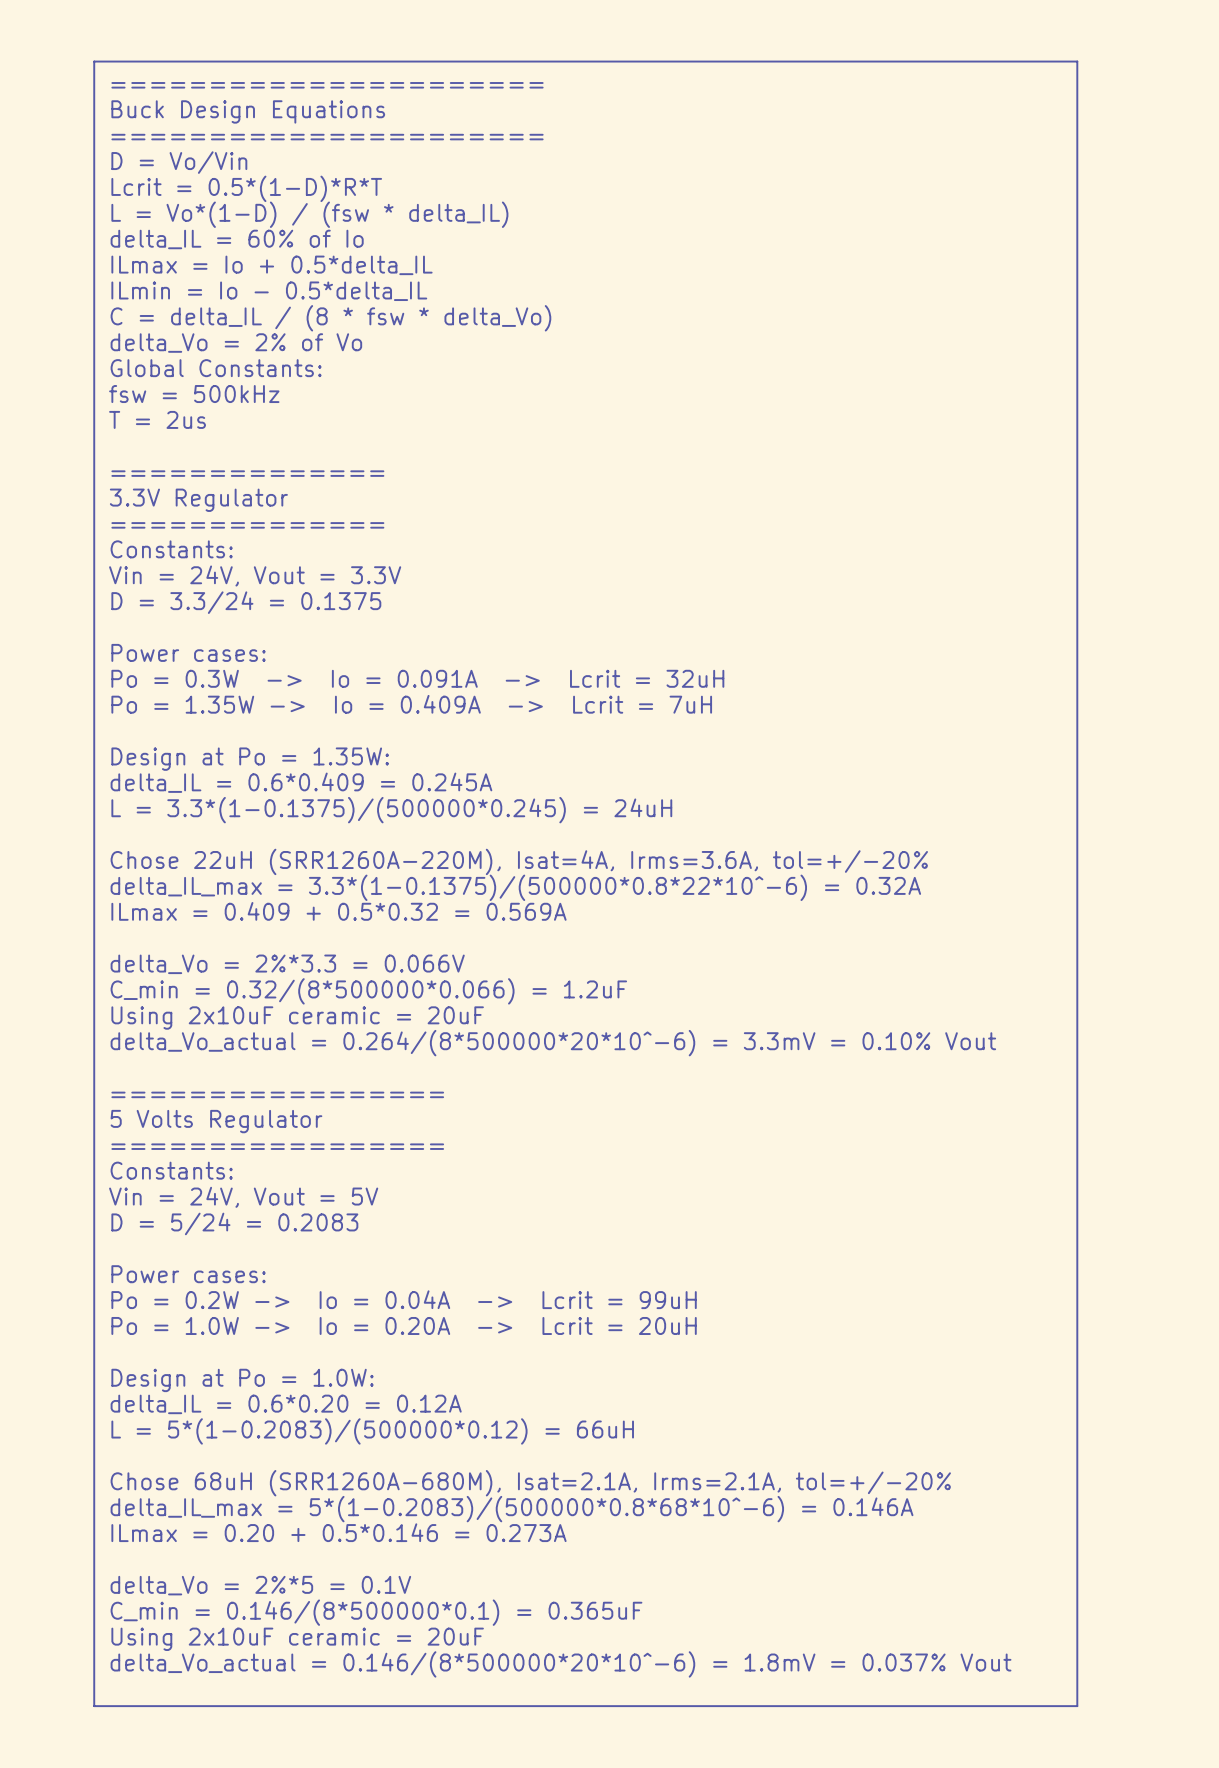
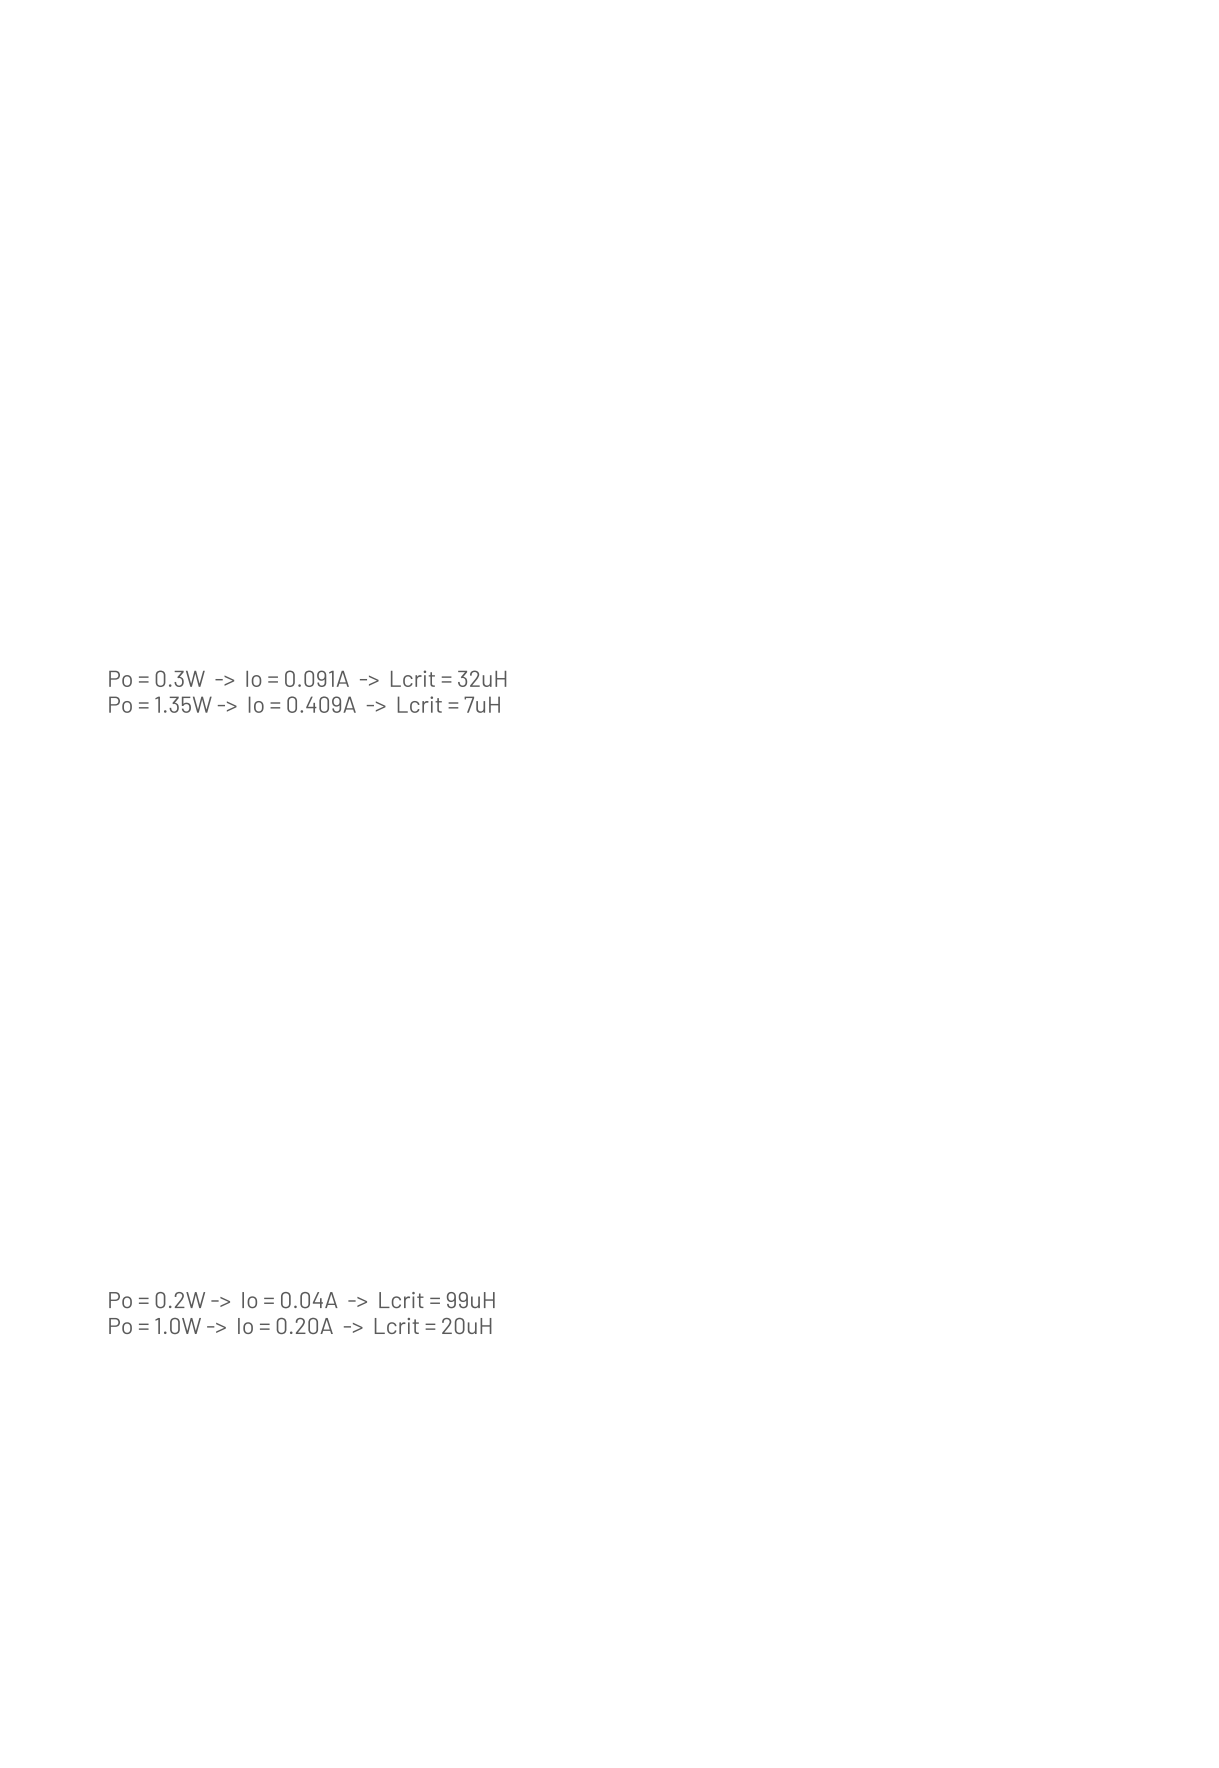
line: (94, 61) (1077, 61) (1077, 1706) (94, 1706) (94, 61) -> none
text: ====================== (327, 85) -> none
text: Buck Design Equations (248, 111) -> none
text: ====================== (327, 137) -> none
text: D = Vo/Vin (179, 162) -> none
text: Lcrit = 0.5*(1-D)*R*T (246, 188) -> none
text: L = Vo*(1-D) / (fsw * delta_IL) (309, 214) -> none
text: delta_IL = 60% of Io (237, 239) -> none
text: ILmax = Io + 0.5*delta_IL (271, 265) -> none
text: ILmin = Io - 0.5*delta_IL (269, 291) -> none
text: C = delta_IL / (8 * fsw * delta_Vo) (330, 318) -> none
text: delta_Vo = 2% of Vo (236, 343) -> none
text: Global Constants: (216, 368) -> none
text: fsw = 500kHz (194, 394) -> none
text: T = 2us (157, 419) -> none
text: ============== (247, 473) -> none
text: 3.3V Regulator (198, 500) -> none
text: ============== (247, 525) -> none
text: Constants: (171, 549) -> none
text: Vin = 24V, Vout = 3.3V (255, 576) -> none
text: D = 3.3/24 = 0.1375 (246, 602) -> none
text: Power cases: (188, 652) -> none
text: Design at Po = 1.35W: (250, 759) -> none
text: delta_IL = 0.6*0.409 = 0.245A (301, 782) -> none
text: L = 3.3*(1-0.1375)/(500000*0.245) = 24uH (391, 810) -> none
text: Chose 22uH (SRR1260A-220M), Isat=4A, Irms=3.6A, tol=+/-20% (519, 861) -> none
text: delta_IL_max = 3.3*(1-0.1375)/(500000*0.8*22*10^-6) = 0.32A (515, 887) -> none
text: ILmax = 0.409 + 0.5*0.32 = 0.569A (338, 911) -> none
text: delta_Vo = 2%*3.3 = 0.066V (287, 964) -> none
text: C_min = 0.32/(8*500000*0.066) = 1.2uF (368, 991) -> none
text: Using 2x10uF ceramic = 20uF (297, 1018) -> none
text: delta_Vo_actual = 0.264/(8*500000*20*10^-6) = 3.3mV = 0.10% Vout (553, 1043) -> none
text: ================= (277, 1094) -> none
text: 5 Volts Regulator (216, 1121) -> none
text: ================= (277, 1146) -> none
text: Constants: (171, 1170) -> none
text: Vin = 24V, Vout = 5V (243, 1197) -> none
text: D = 5/24 = 0.2083 (234, 1223) -> none
text: Power cases: (188, 1274) -> none
text: Design at Po = 1.0W: (242, 1380) -> none
text: delta_IL = 0.6*0.20 = 0.12A (286, 1404) -> none
text: L = 5*(1-0.2083)/(500000*0.12) = 66uH (372, 1431) -> none
text: Chose 68uH (SRR1260A-680M), Isat=2.1A, Irms=2.1A, tol=+/-20% (530, 1483) -> none
text: delta_IL_max = 5*(1-0.2083)/(500000*0.8*68*10^-6) = 0.146A (512, 1509) -> none
text: ILmax = 0.20 + 0.5*0.146 = 0.273A (338, 1532) -> none
text: delta_Vo = 2%*5 = 0.1V (260, 1585) -> none
text: C_min = 0.146/(8*500000*0.1) = 0.365uF (376, 1612) -> none
text: Using 2x10uF ceramic = 20uF (297, 1639) -> none
text: delta_Vo_actual = 0.146/(8*500000*20*10^-6) = 1.8mV = 0.037% Vout (561, 1664) -> none

